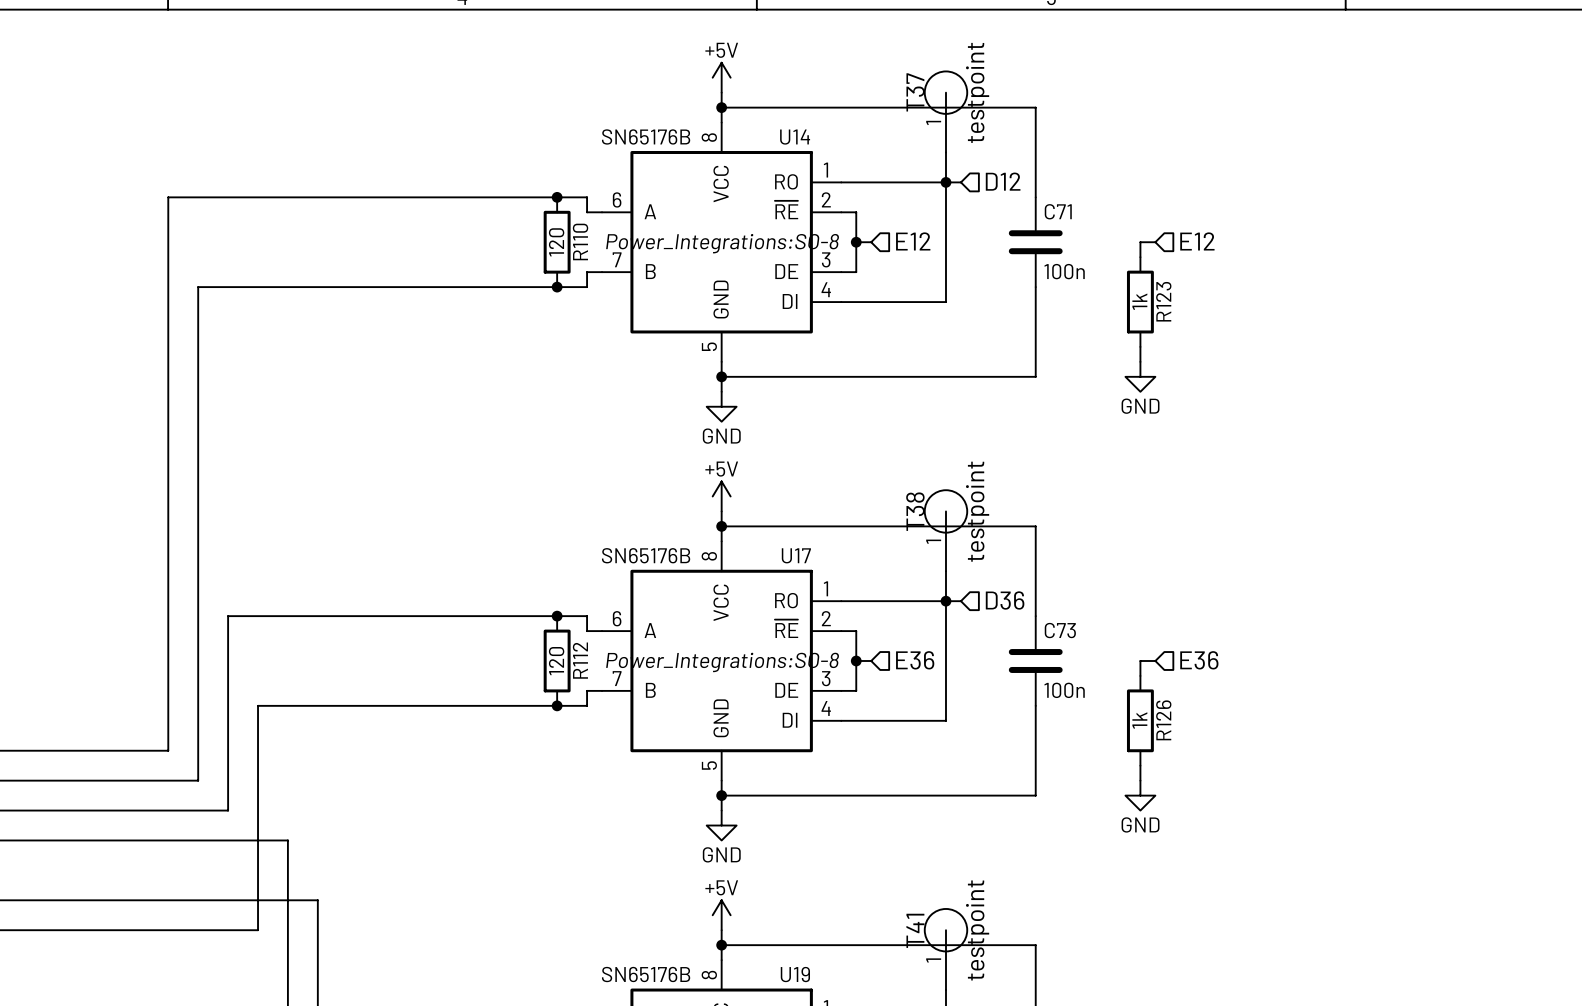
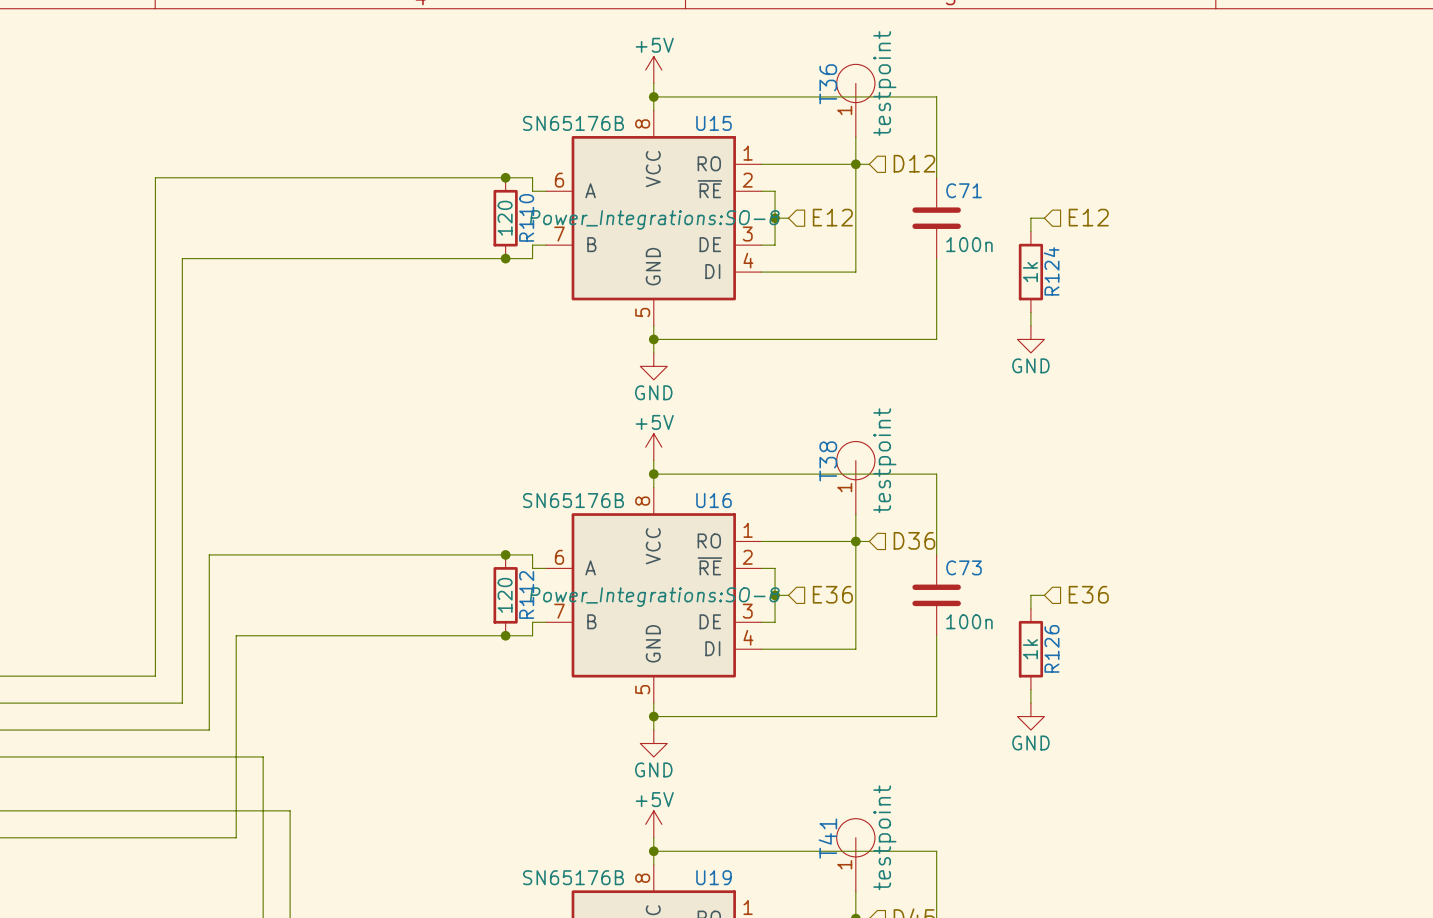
T37 name: T37 (915, 92) -> T36 (828, 84)
U14 name: U14 (795, 137) -> U15 (713, 123)
R123 name: R123 (1163, 301) -> R124 (1051, 271)
U17 name: U17 (796, 555) -> U16 (713, 500)

